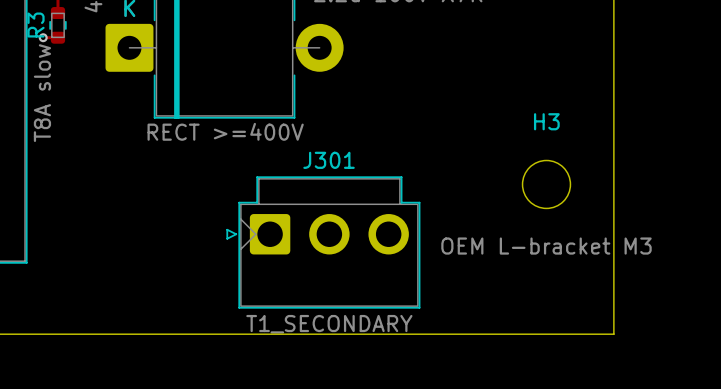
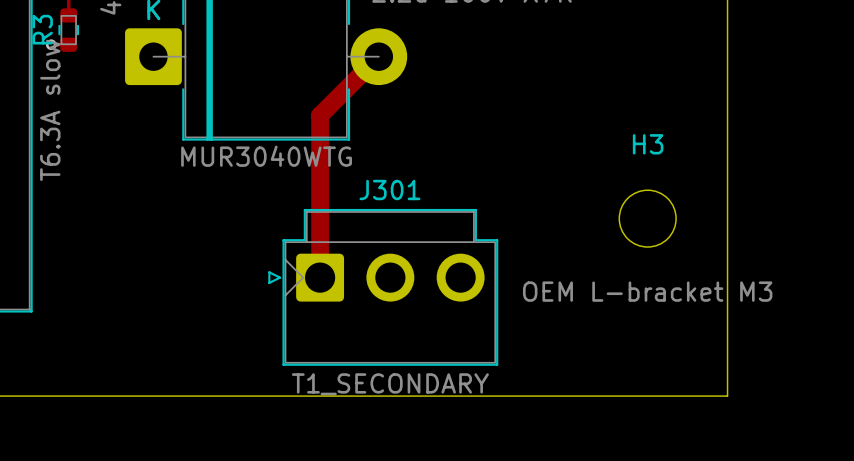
track: none -> (378, 56) (320, 115) (320, 277)
part value: T8A slow (42, 93) -> T6.3A slow (50, 110)
part value: RECT >=400V (225, 131) -> MUR3040WTG (266, 156)

